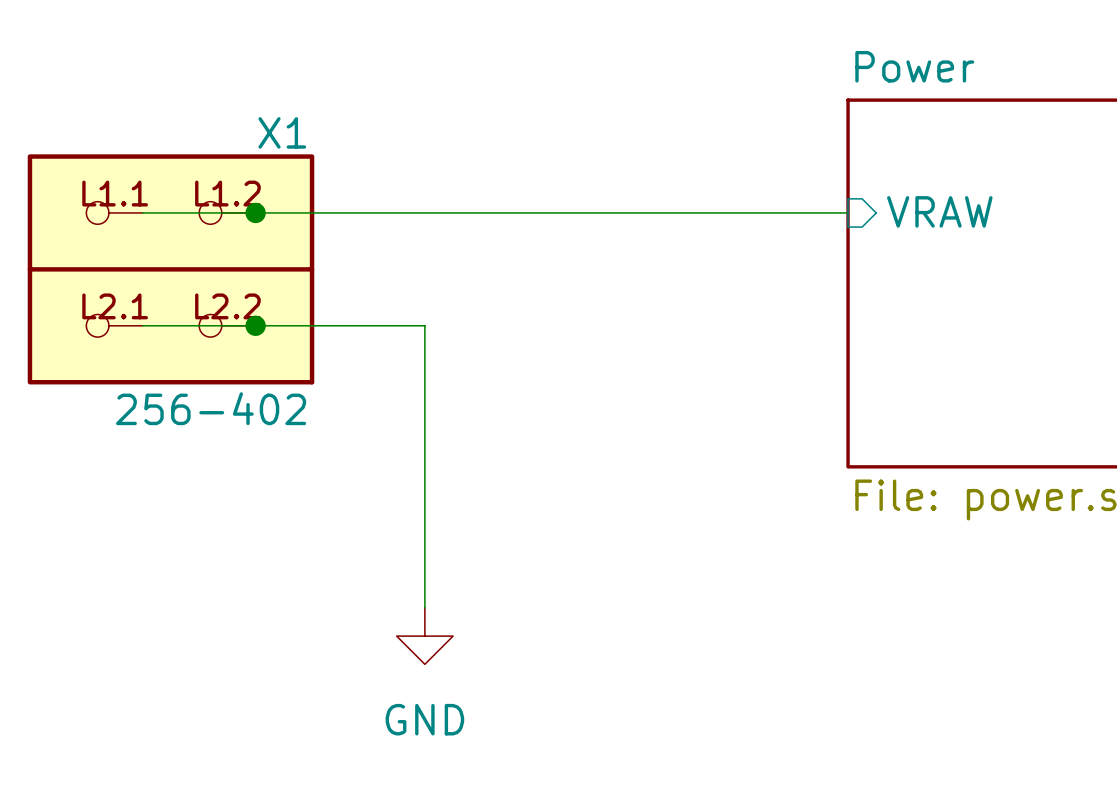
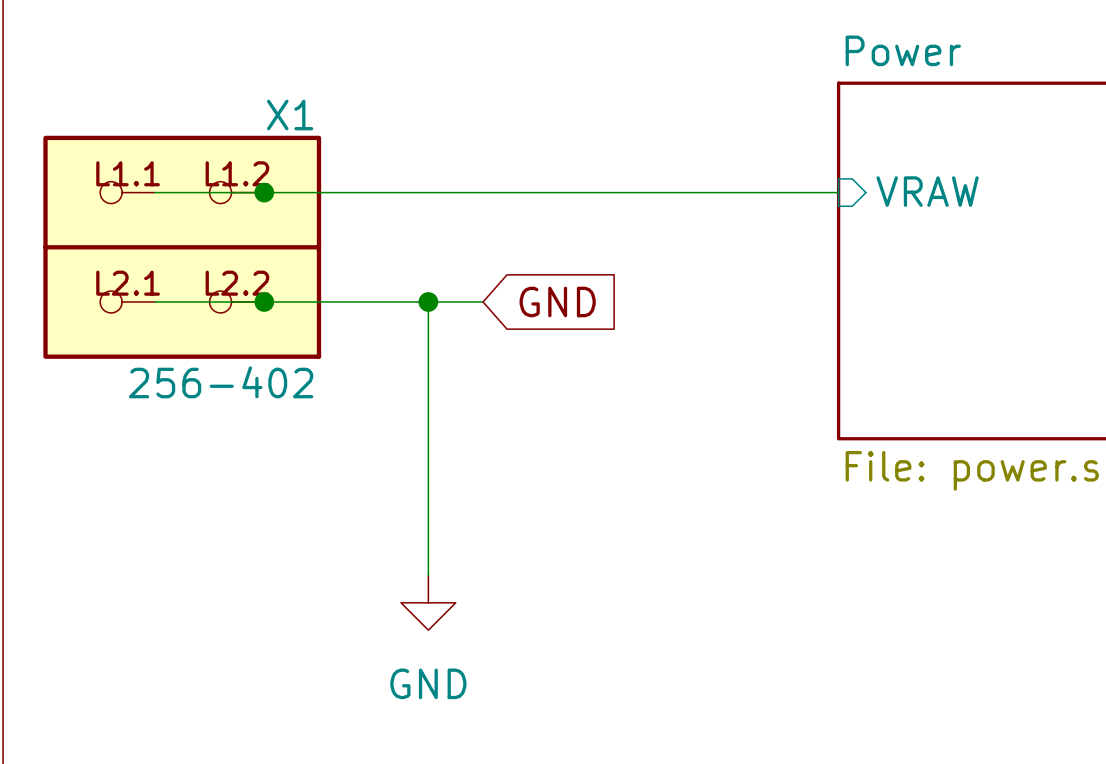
wire: none -> (428, 301) (483, 301)
junction: none -> (428, 301)
global label: none -> GND (557, 301)

